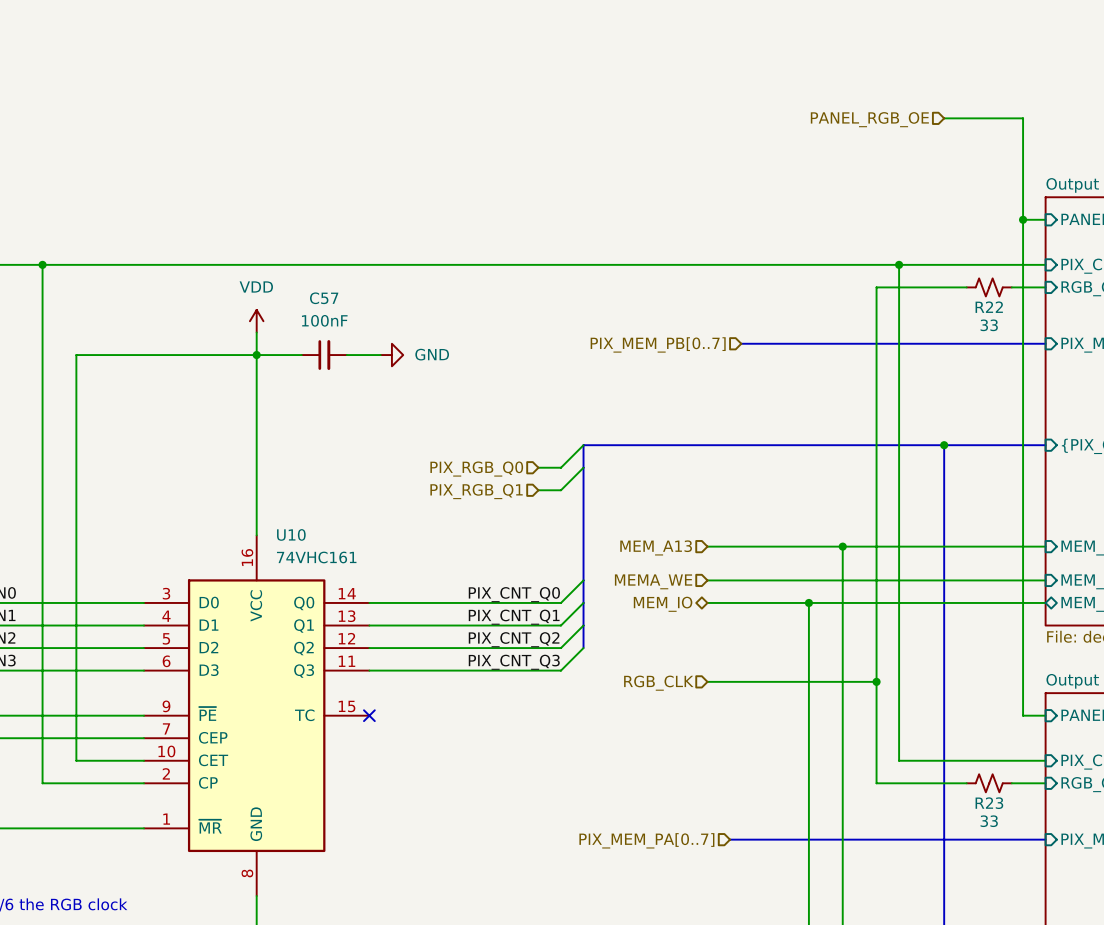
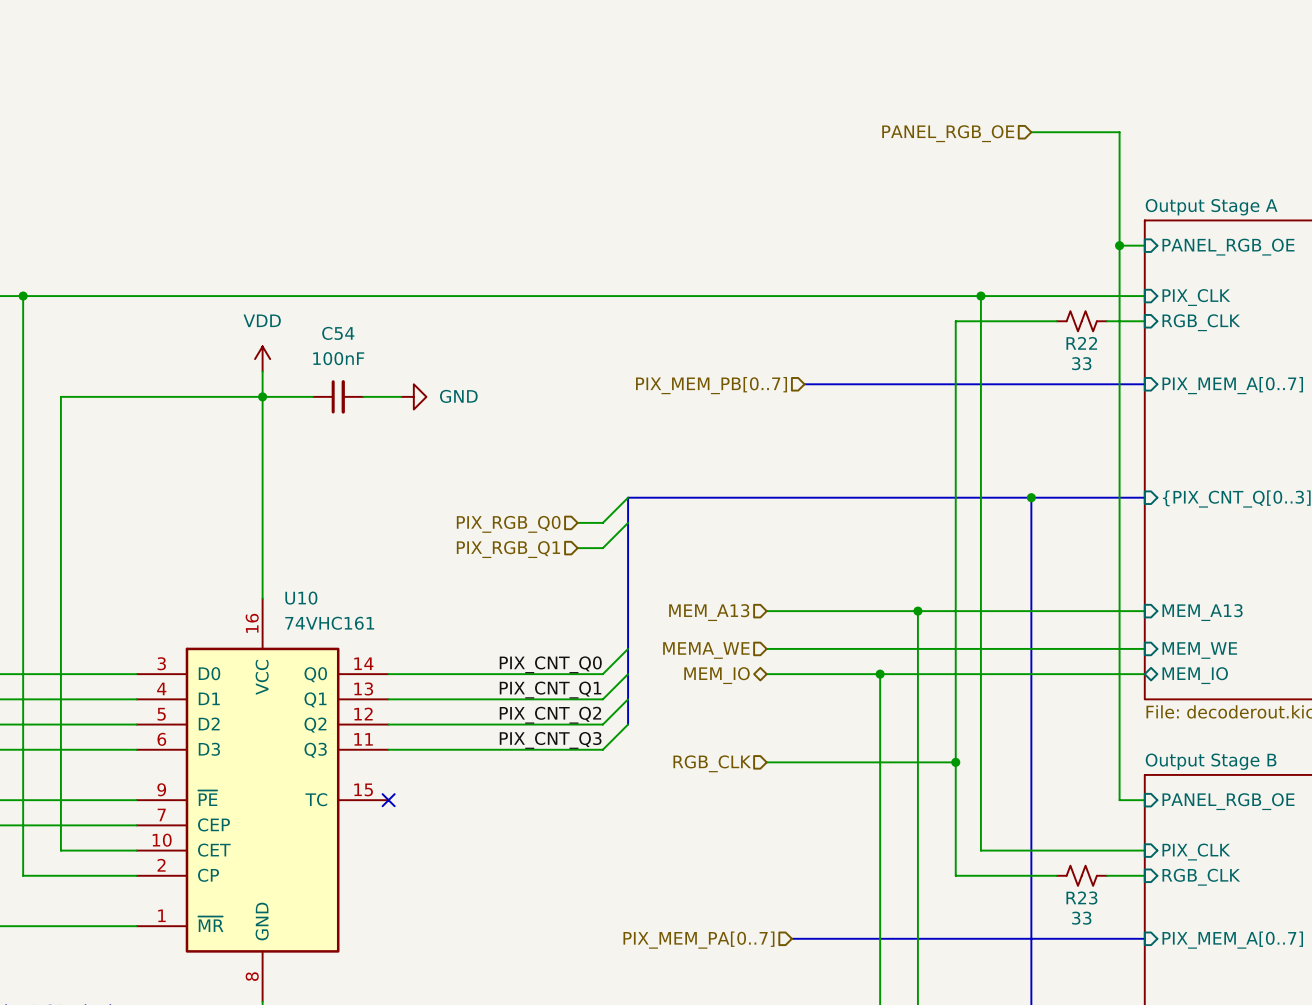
C57 name: C57 (324, 298) -> C54 (338, 333)

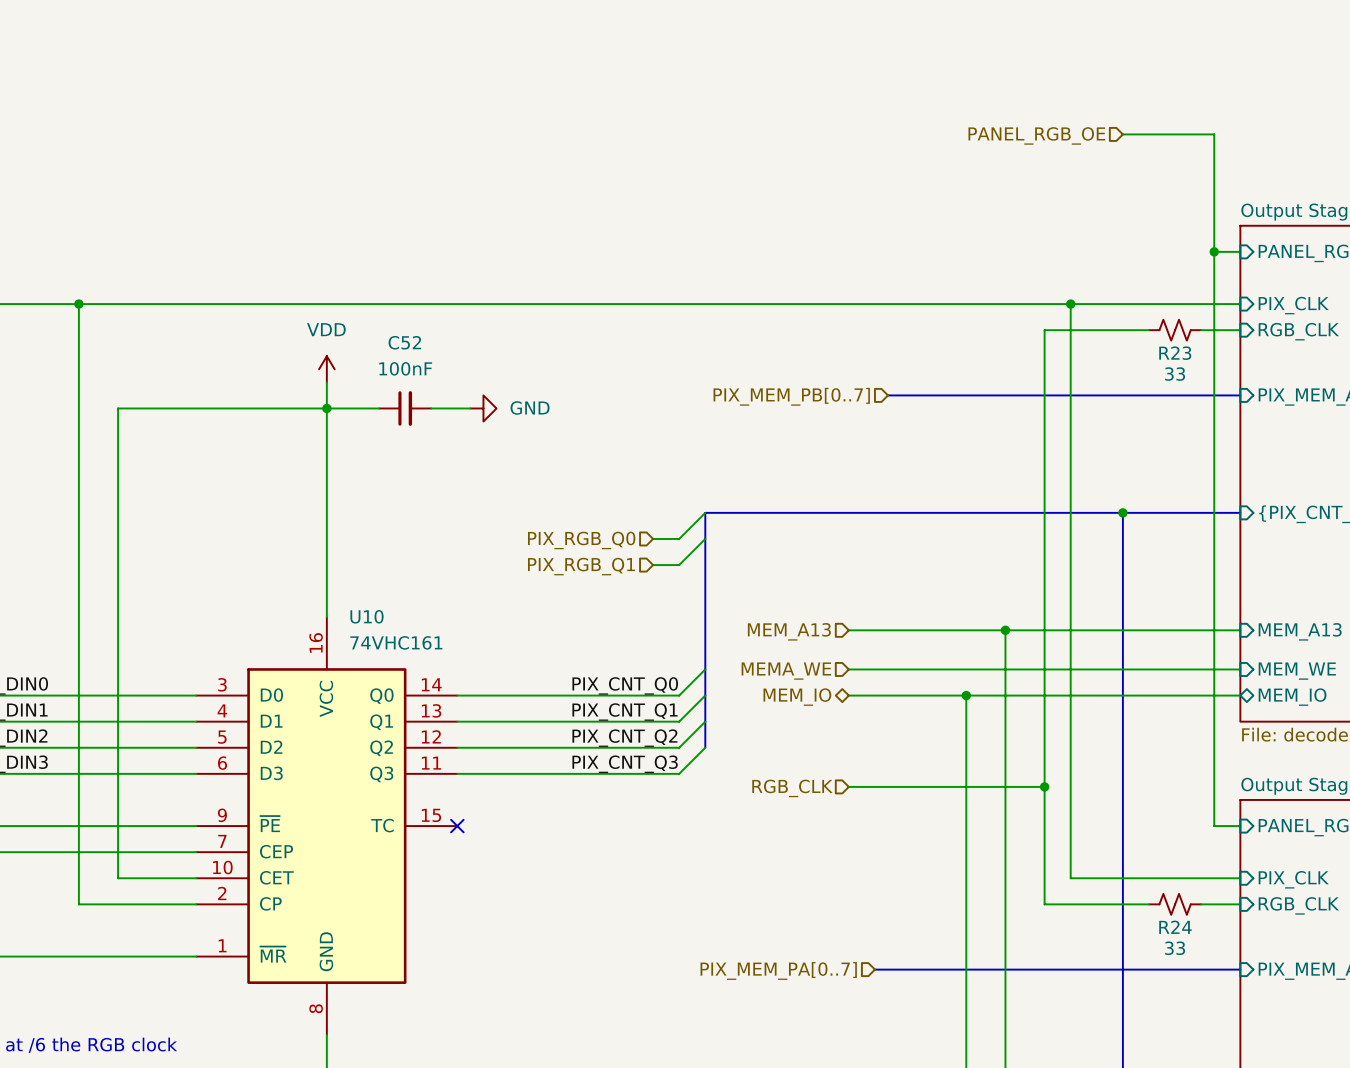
C54 name: C54 (338, 333) -> C52 (404, 342)
R22 name: R22 (1081, 343) -> R23 (1175, 353)
R23 name: R23 (1081, 898) -> R24 (1175, 927)

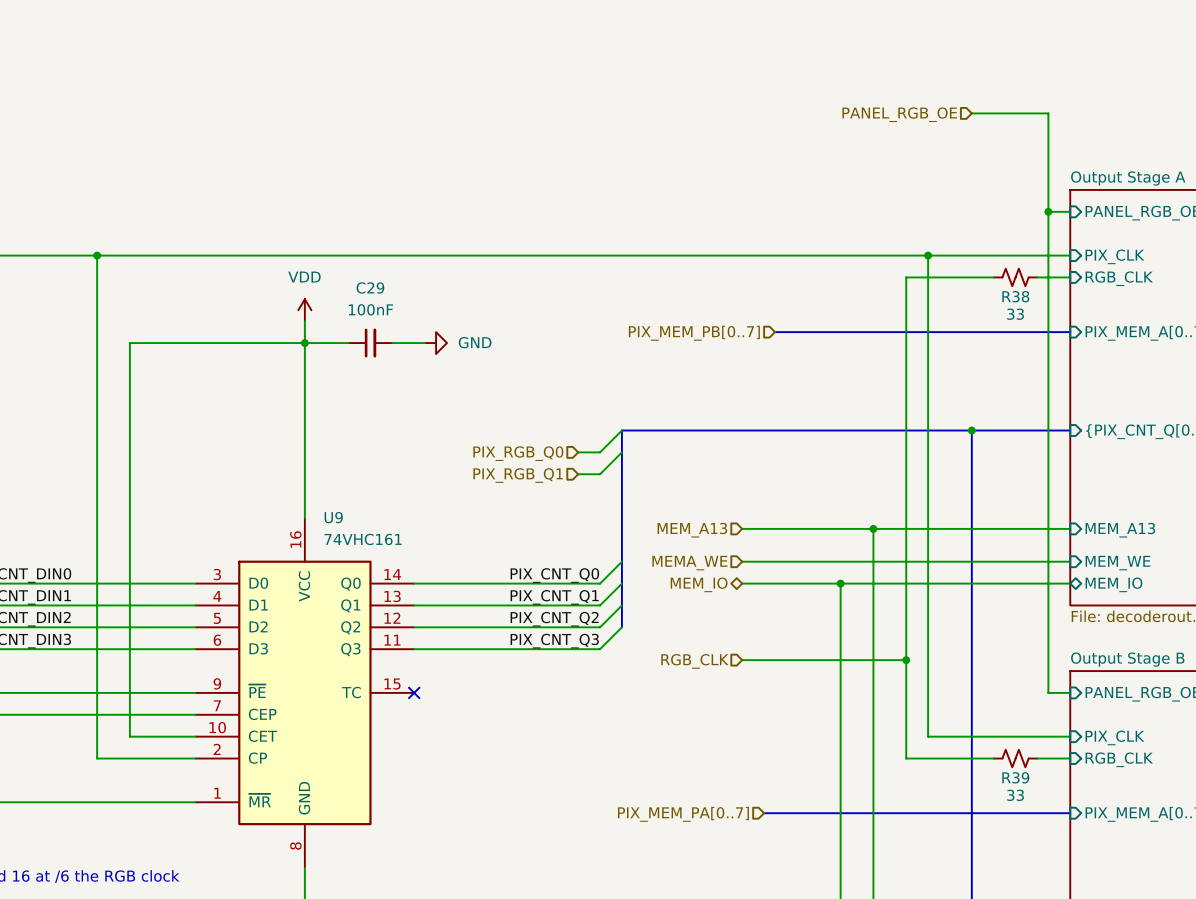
C52 name: C52 (404, 342) -> C29 (370, 287)
R23 name: R23 (1175, 353) -> R38 (1015, 296)
U10 name: U10 (367, 616) -> U9 (333, 517)
R24 name: R24 (1175, 927) -> R39 (1015, 777)

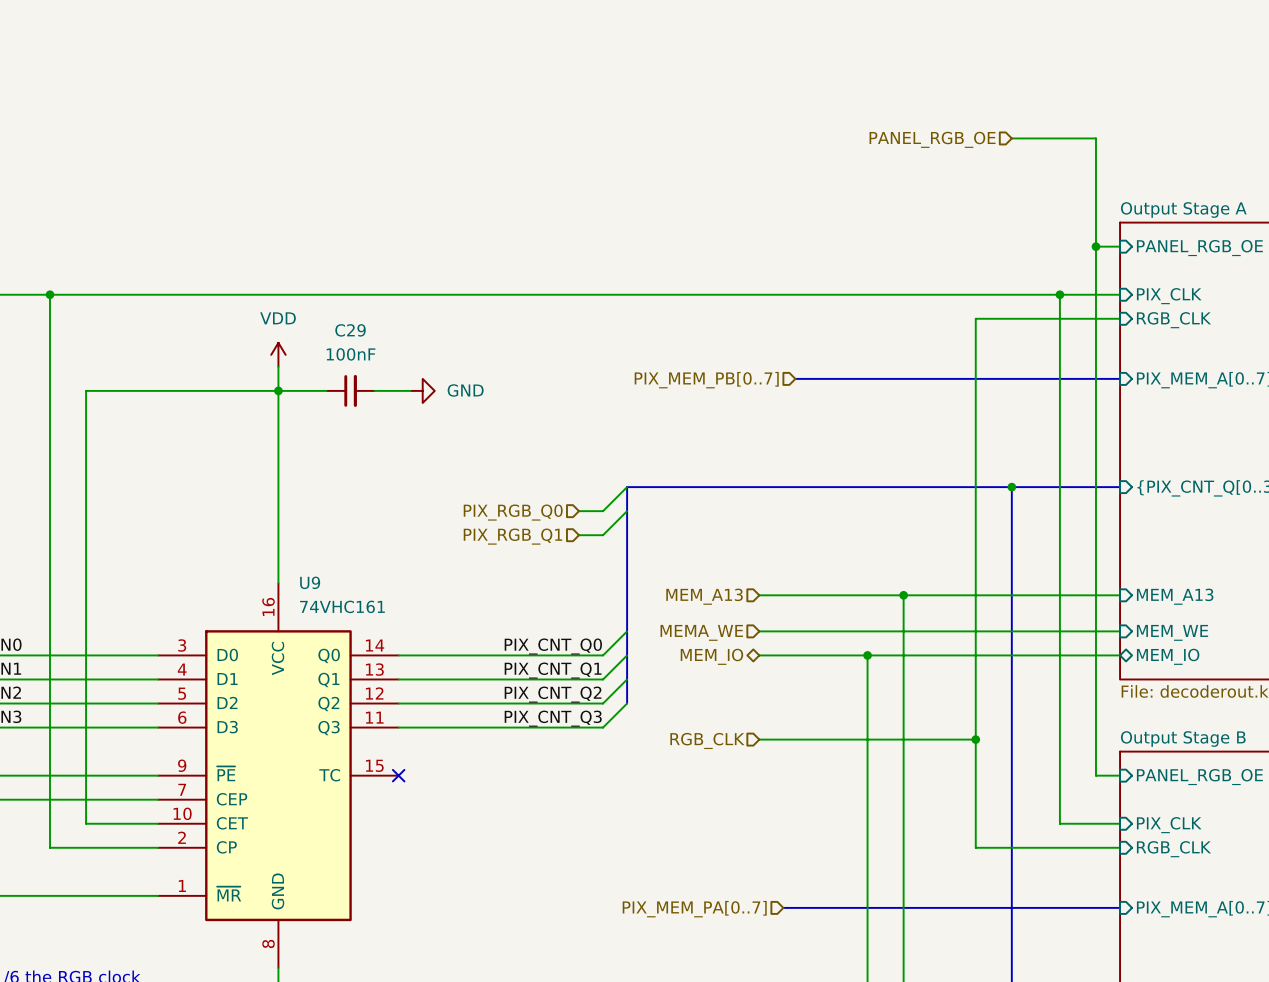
wire: (928, 255) (928, 736) (1015, 736) -> (1059, 294) (1059, 823)
junction: (928, 255) -> none
junction: none -> (1059, 294)
wire: (939, 277) (906, 277) (906, 758) (939, 758) -> (975, 318) (975, 847)
R38: 33 (1015, 277) -> none
wire: none -> (939, 739) (975, 739)
junction position: (906, 660) -> (975, 739)
R39: 33 (1015, 758) -> none

